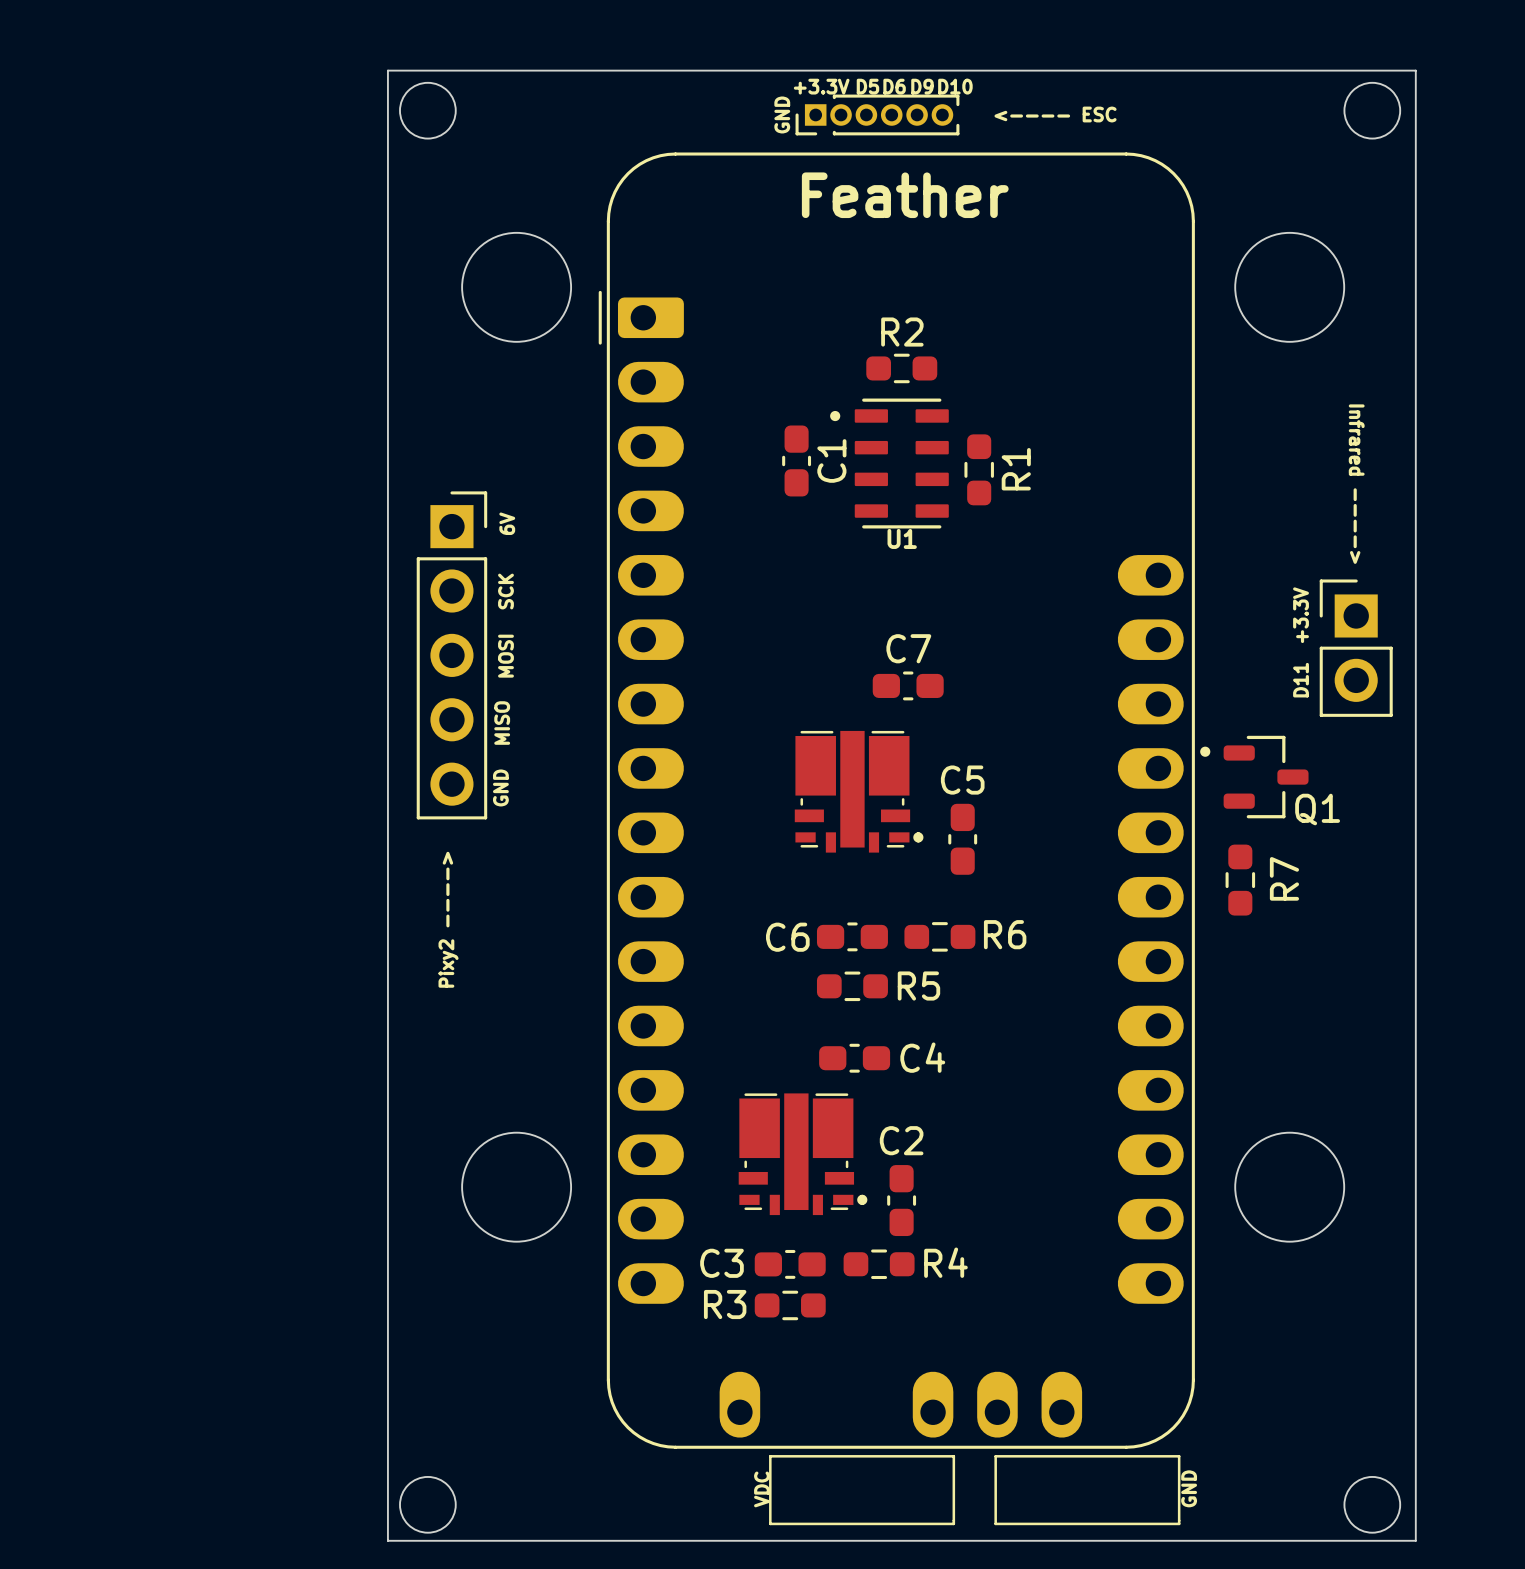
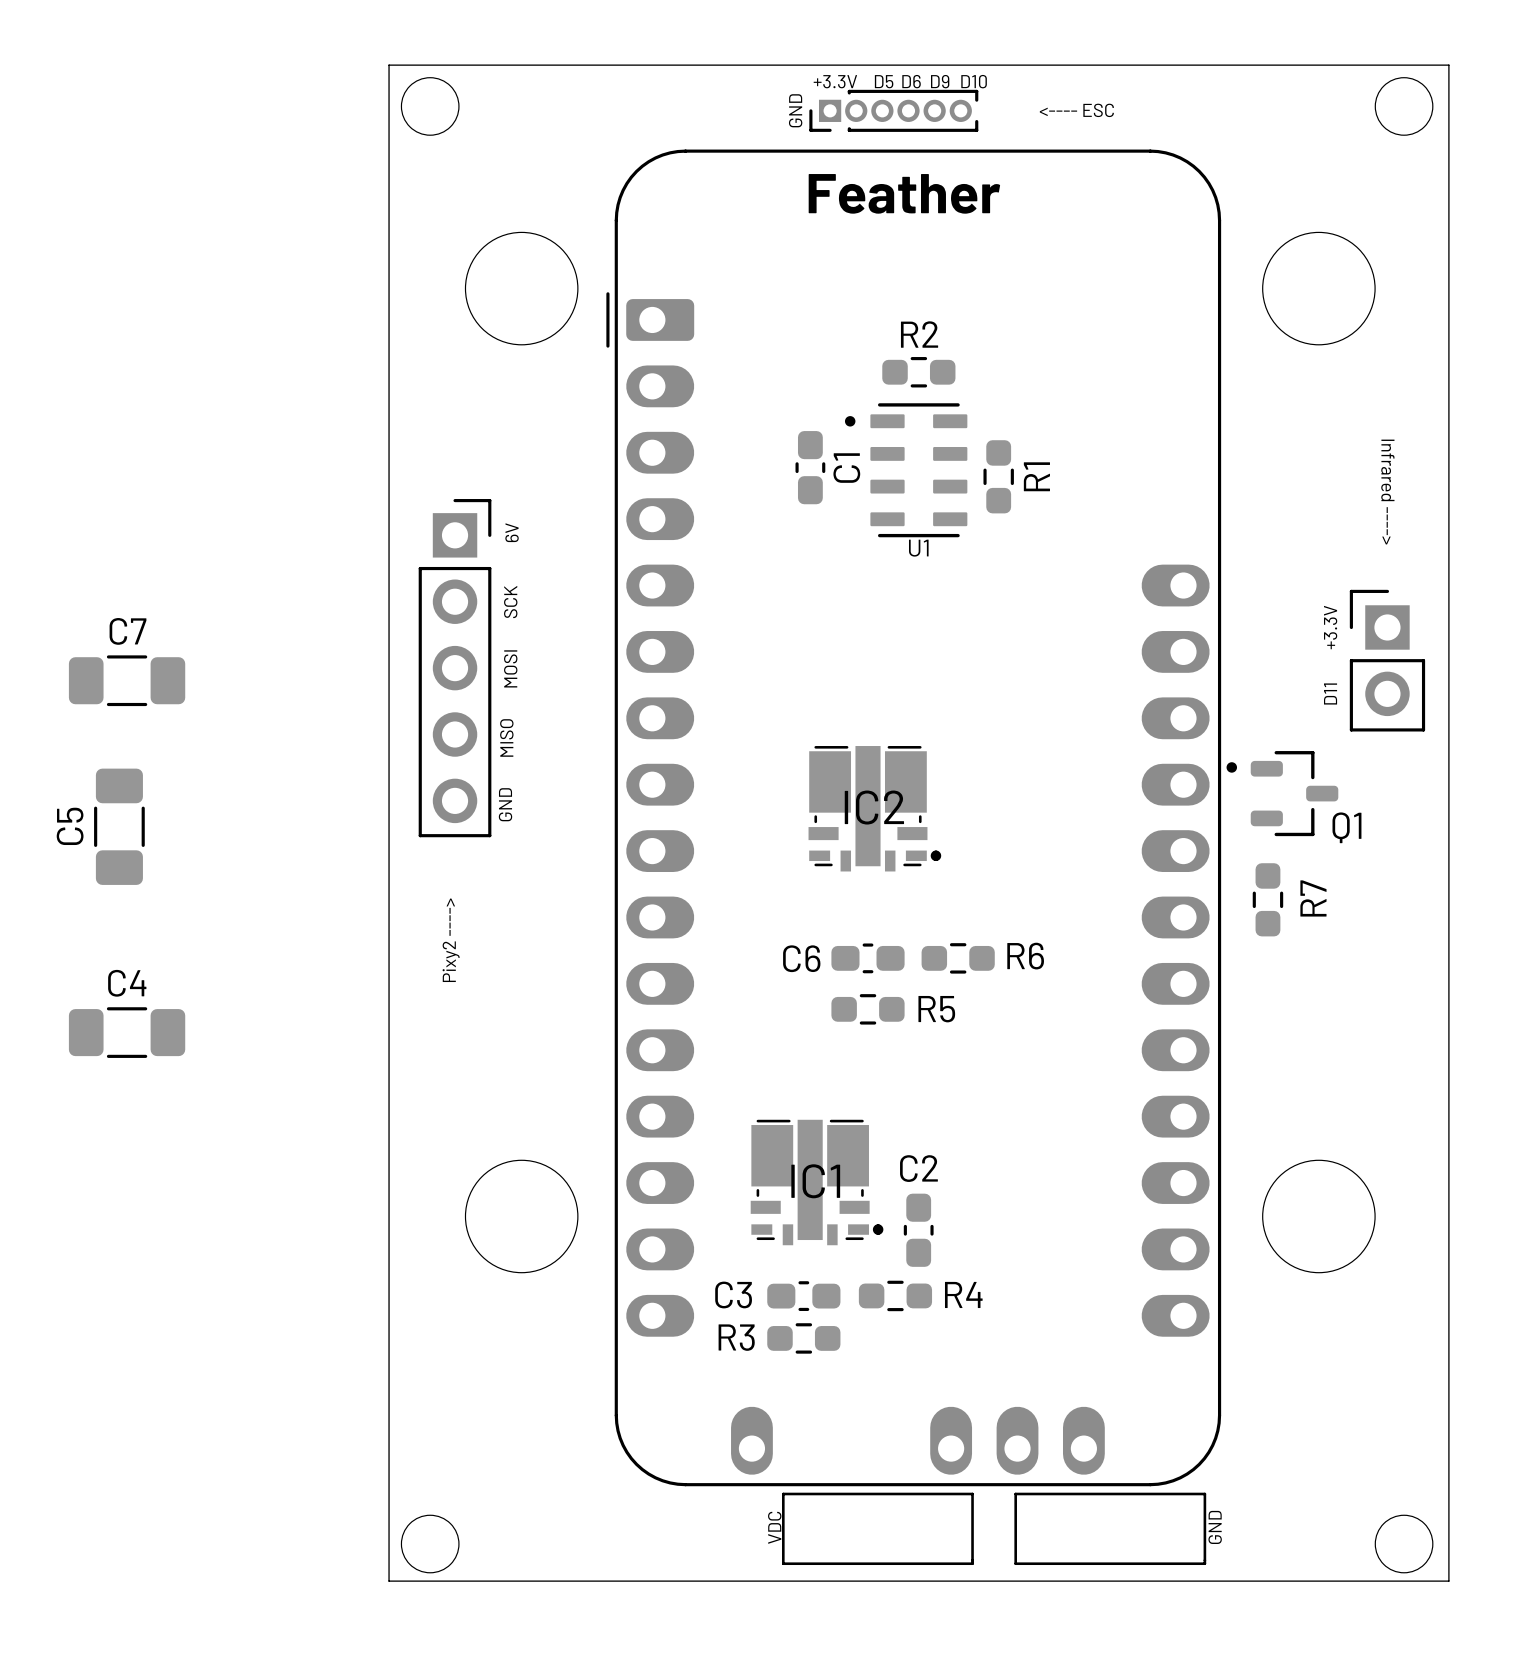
C7 footprint: [872, 671, 944, 701] -> [68, 655, 186, 707]
C5 name position: C5 (962, 780) -> C5 (70, 826)
IC2 name: none -> IC2 (874, 807)
C5 footprint: [948, 803, 978, 875] -> [94, 768, 145, 885]
C4 footprint: [819, 1043, 891, 1073] -> [68, 1007, 186, 1058]
C4 name position: C4 (922, 1057) -> C4 (127, 983)
IC1 name: none -> IC1 (815, 1181)

